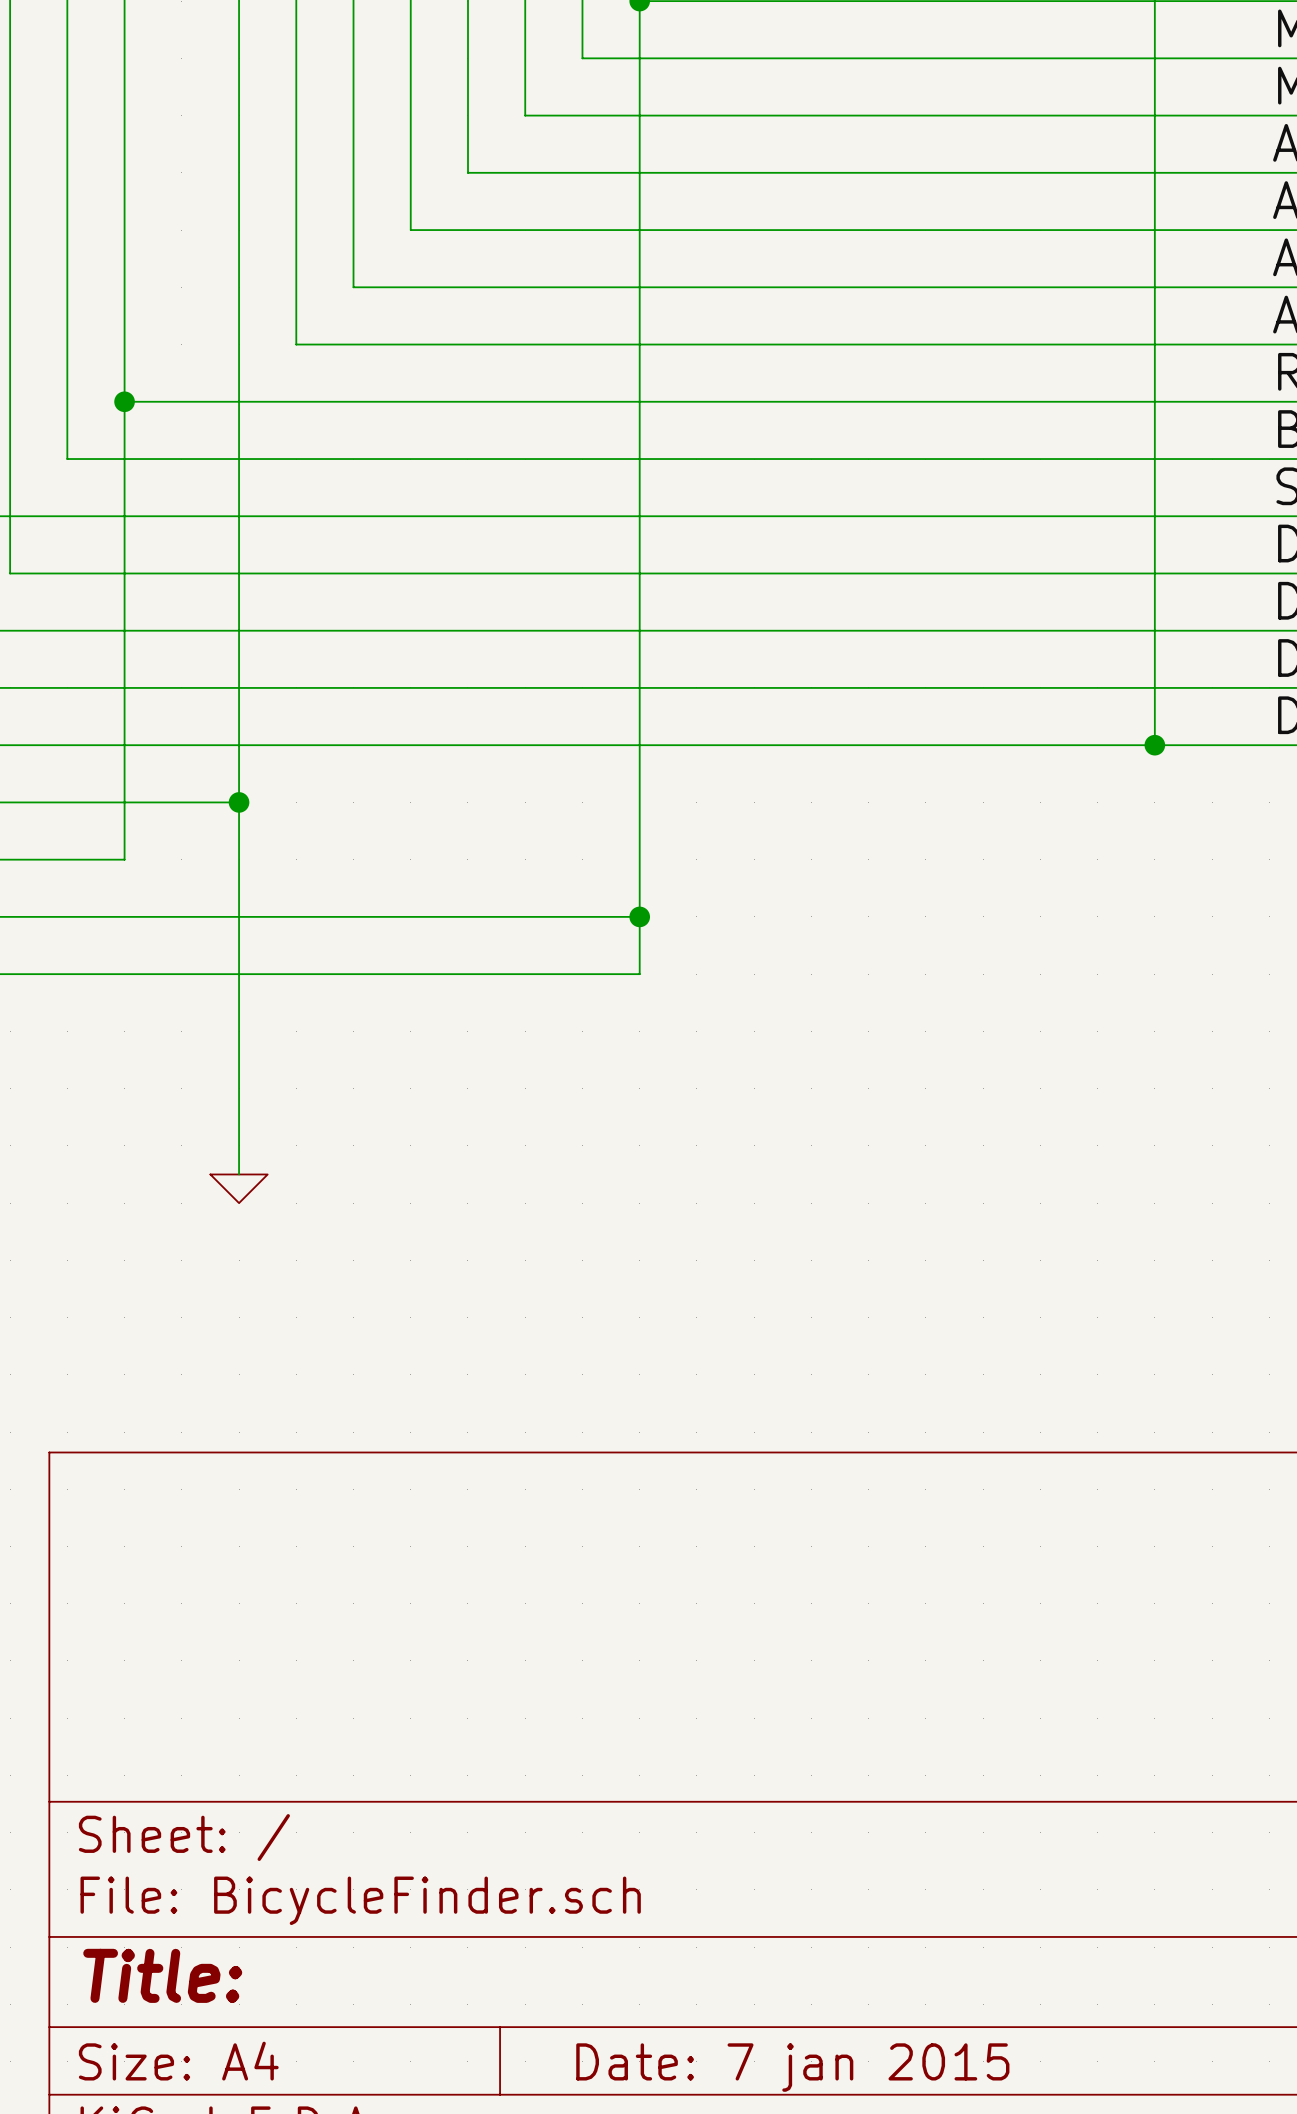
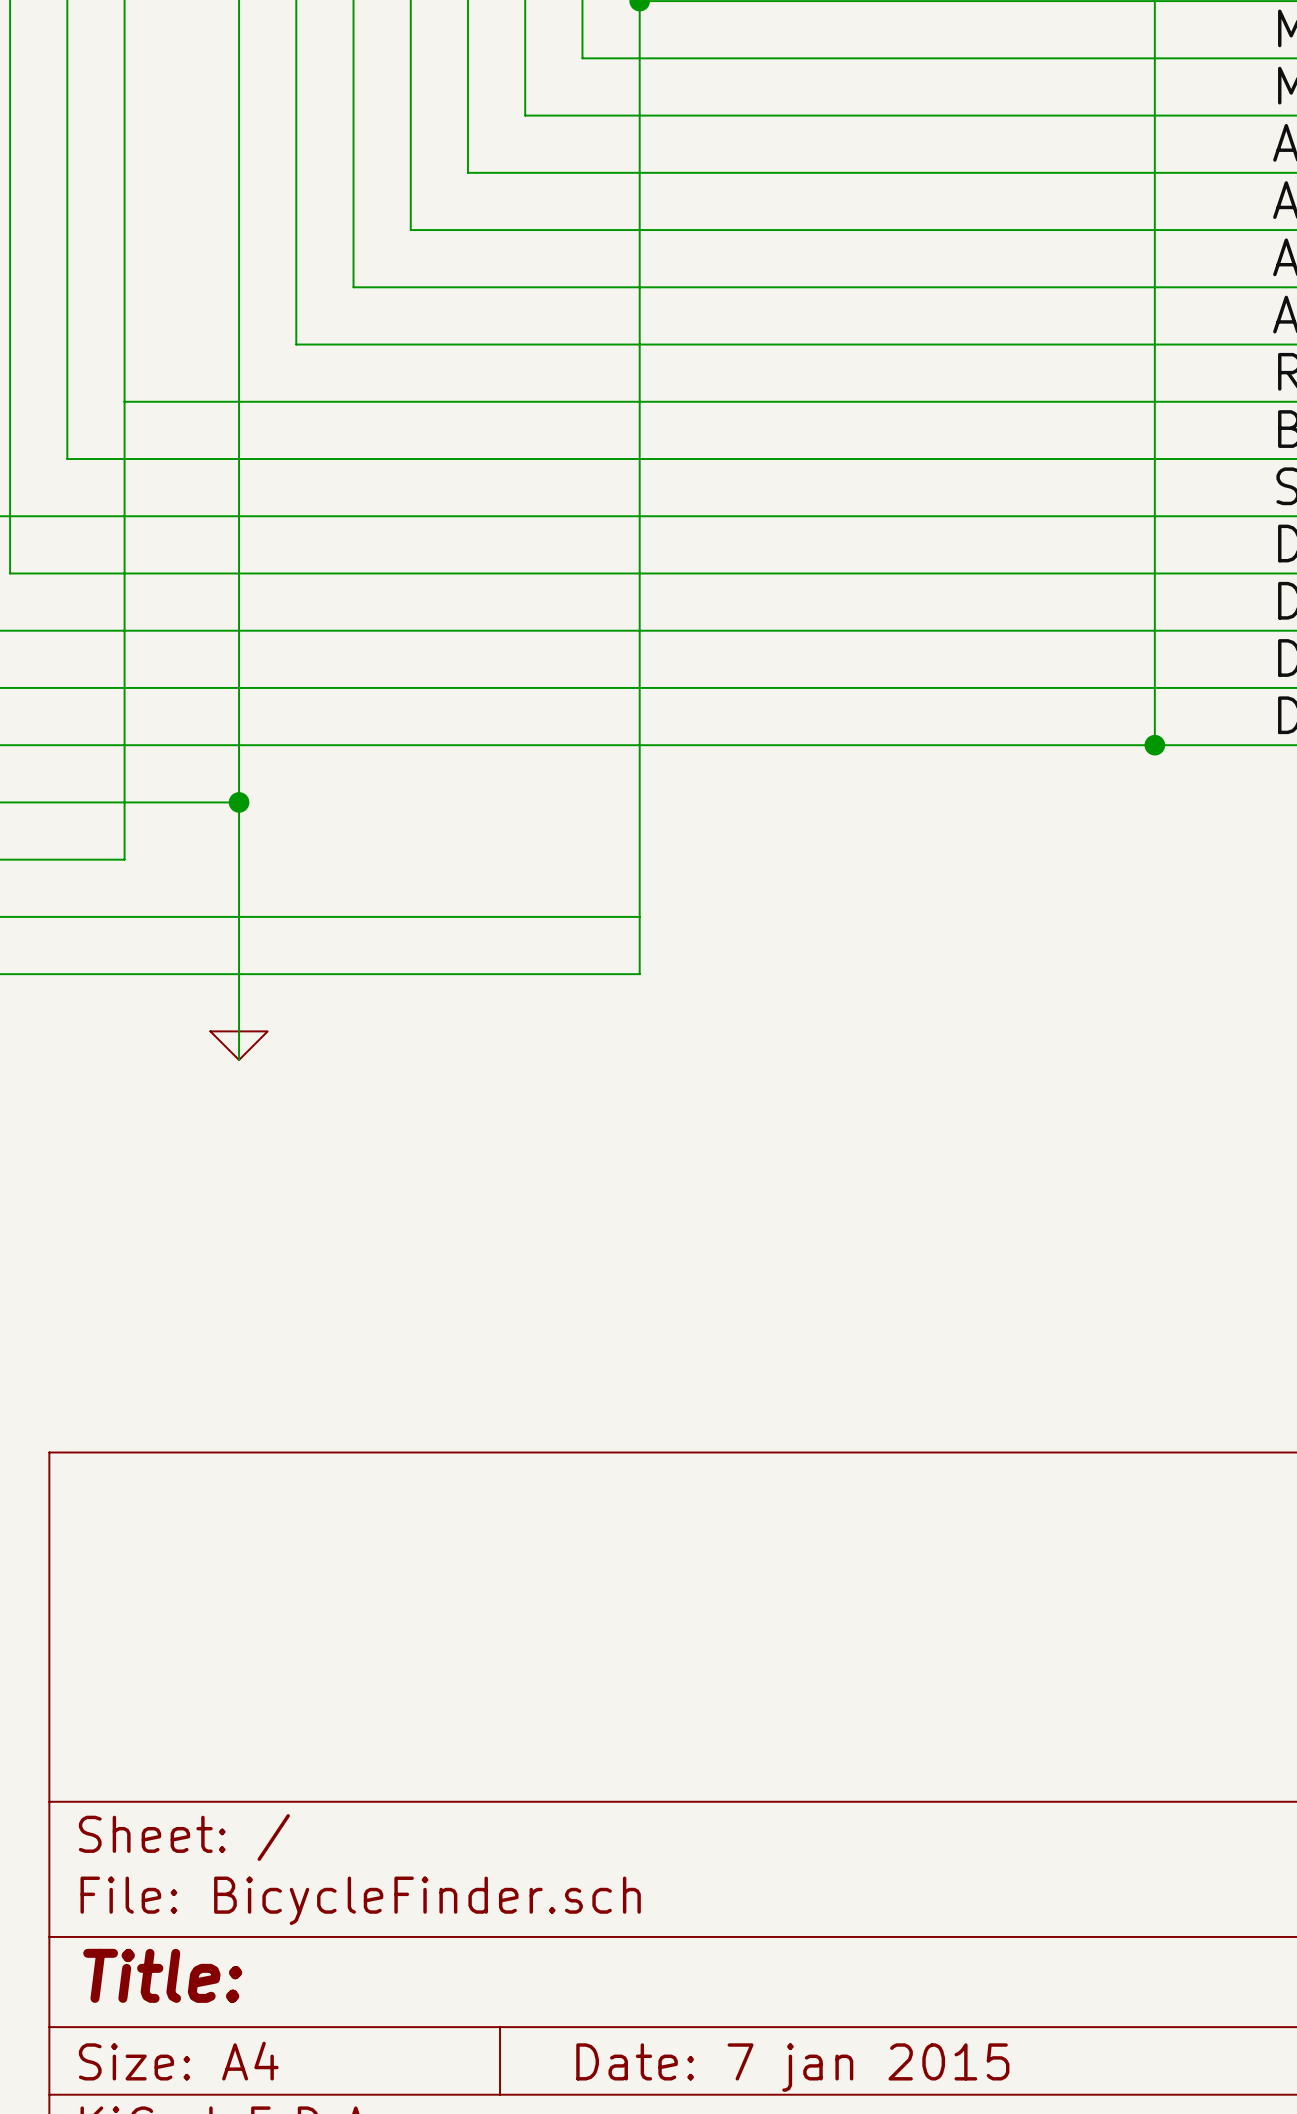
junction: (124, 401) -> none
junction: (639, 916) -> none
wire: (239, 1060) (239, 1174) -> none
power symbol position: (239, 1188) -> (239, 1045)

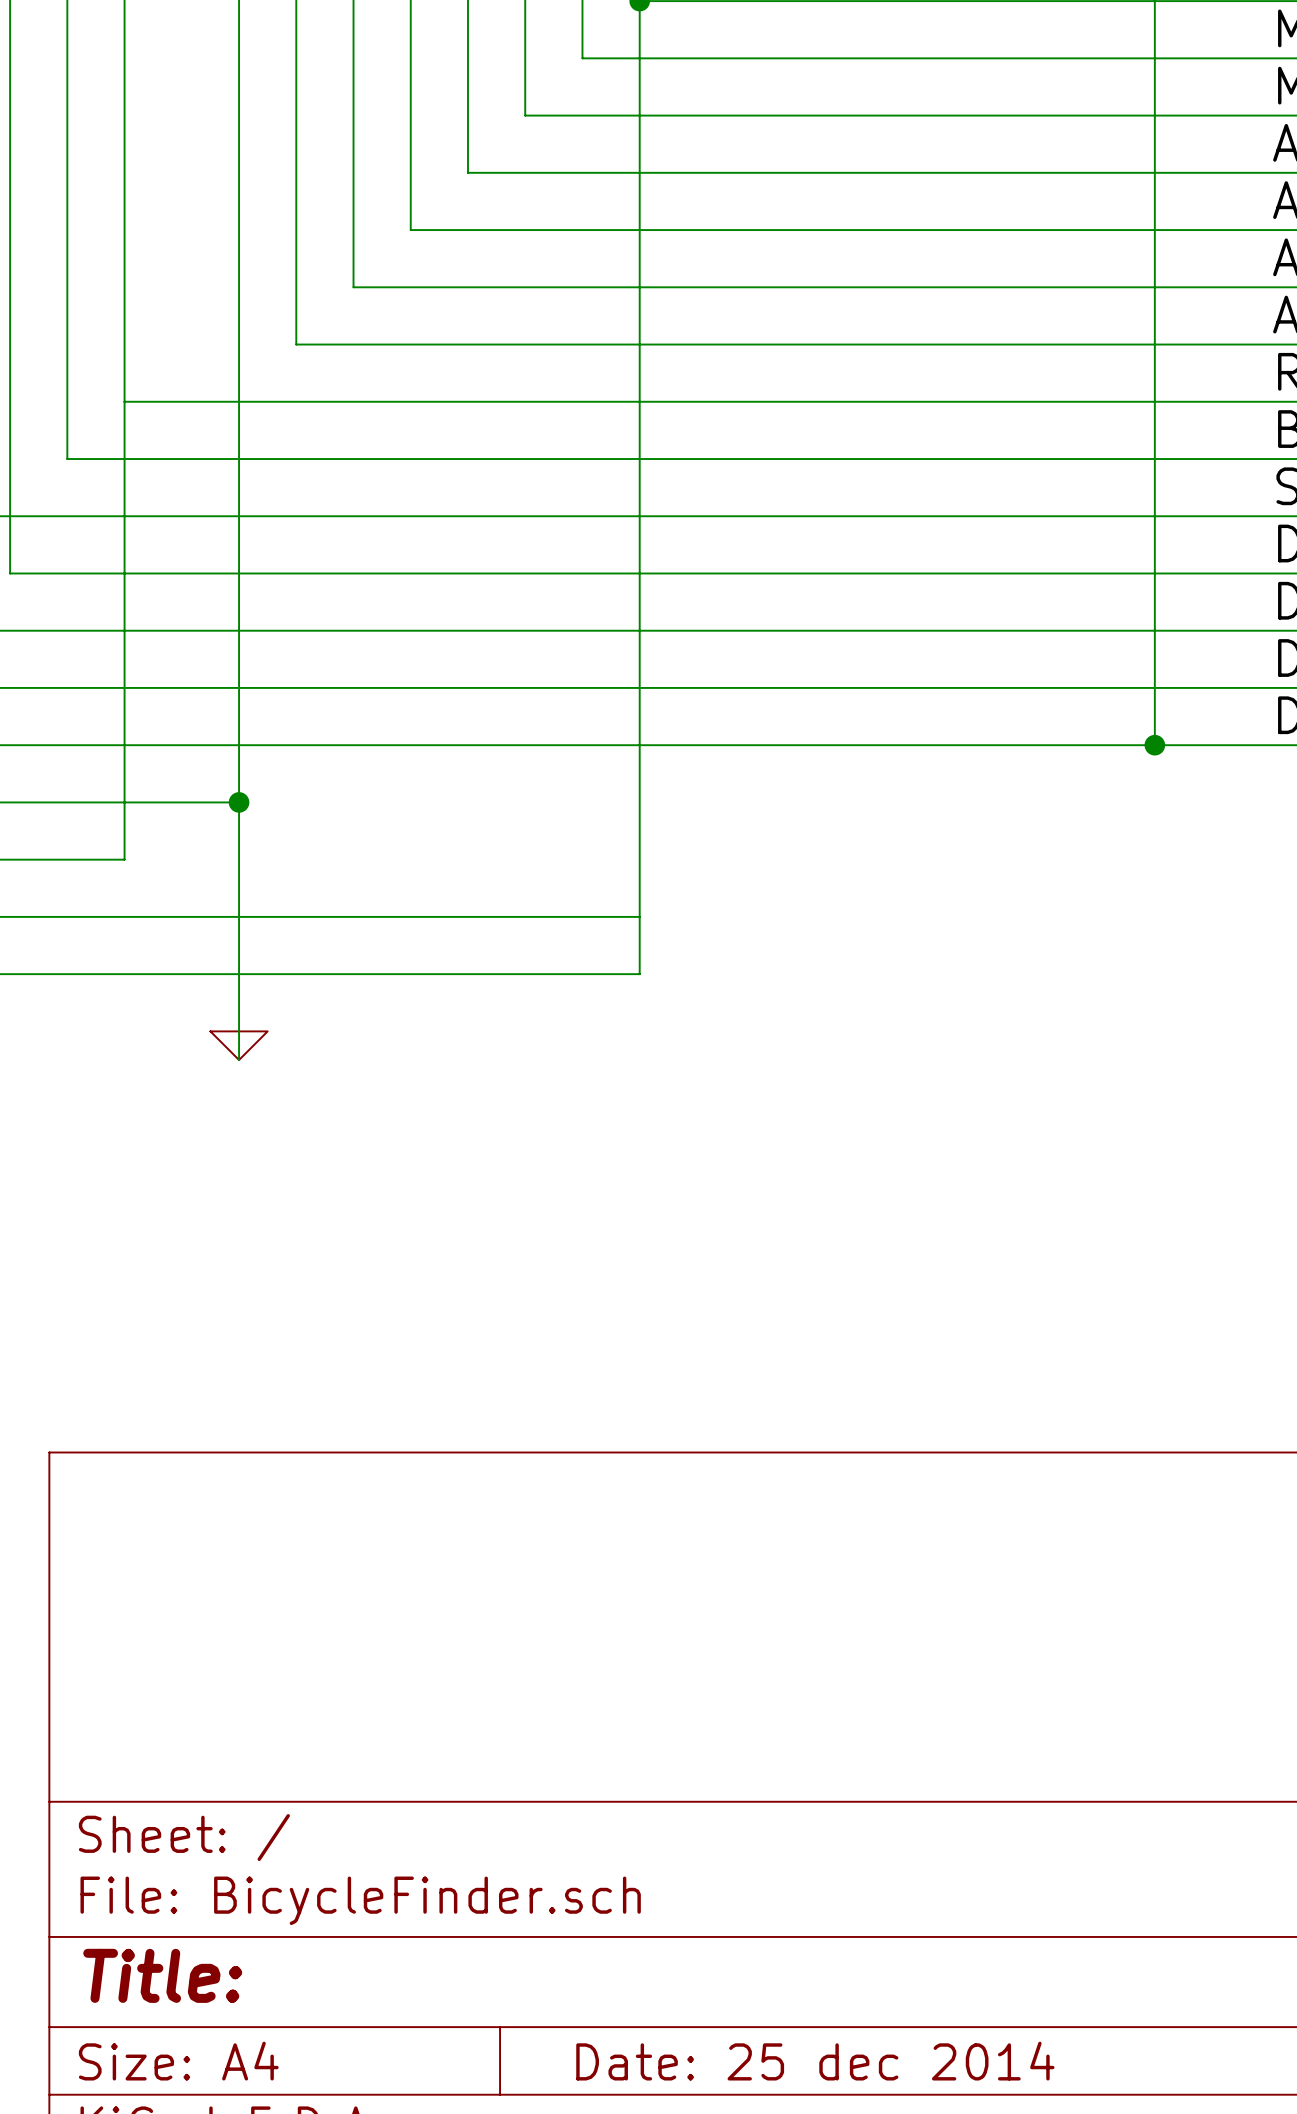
title block: Date: 7 jan 2015 (792, 2067) -> Date: 25 dec 2014 (815, 2061)

